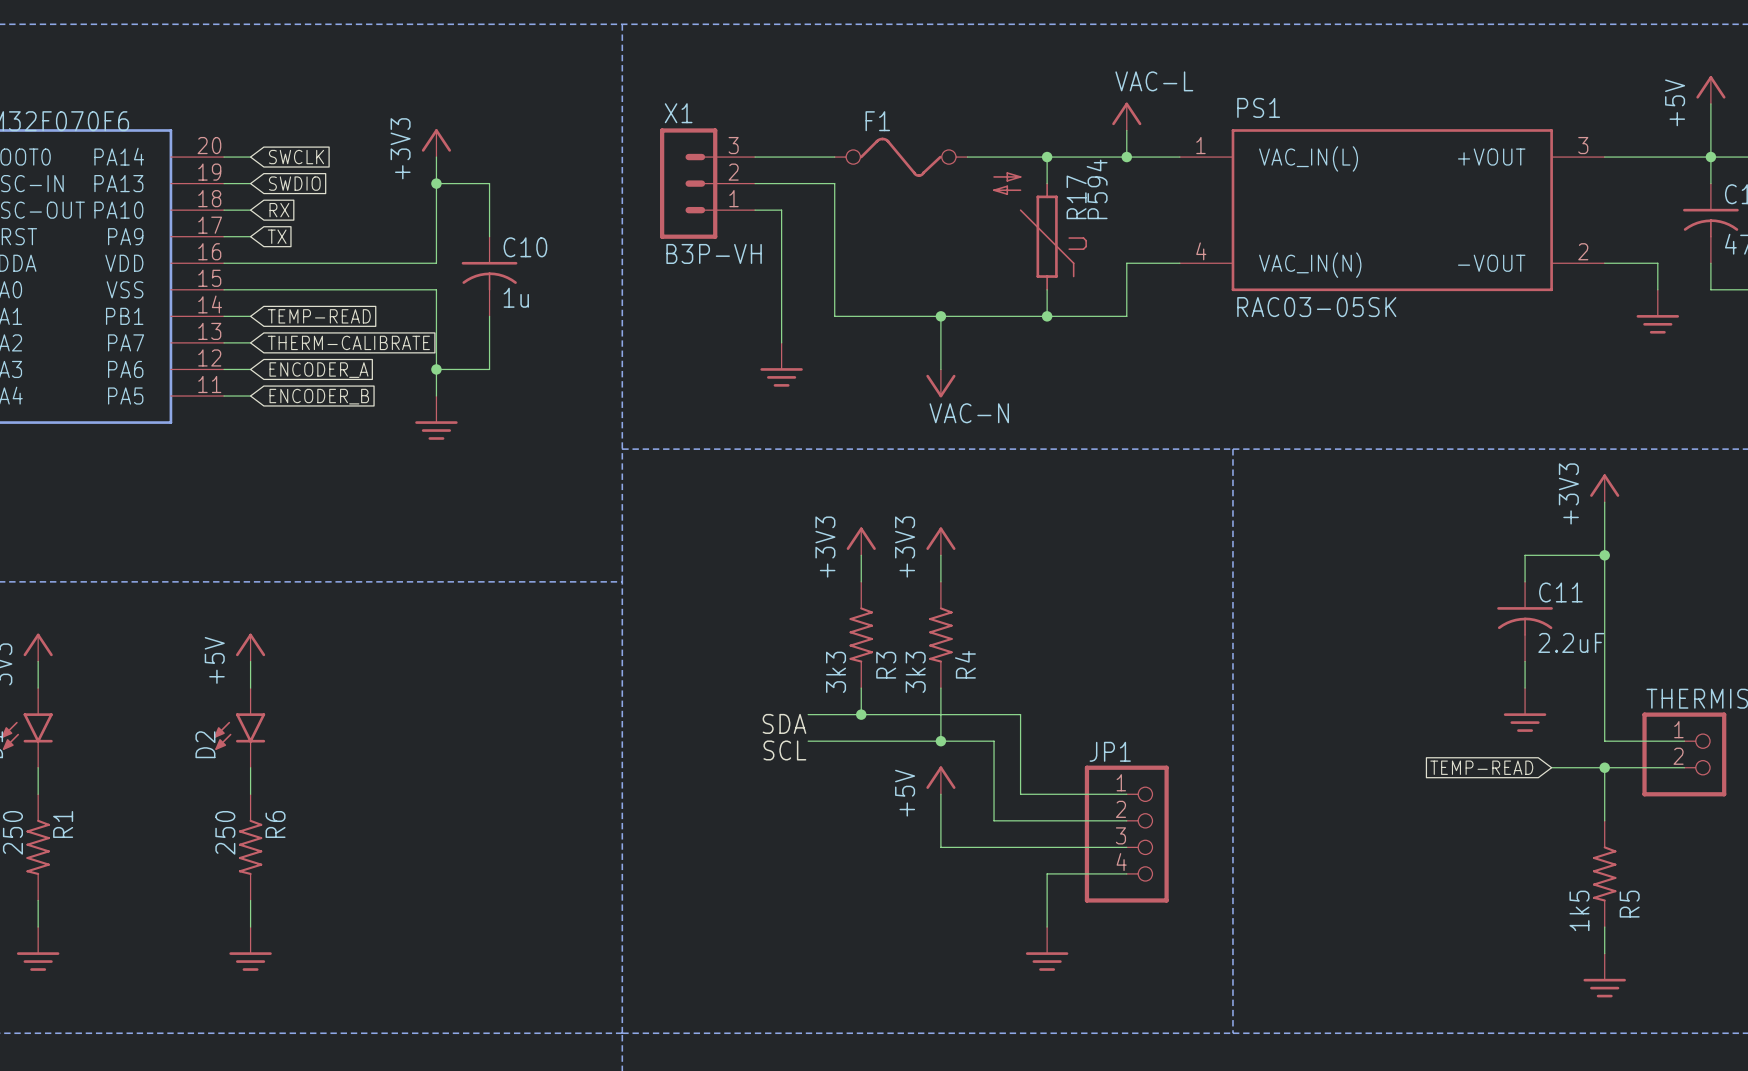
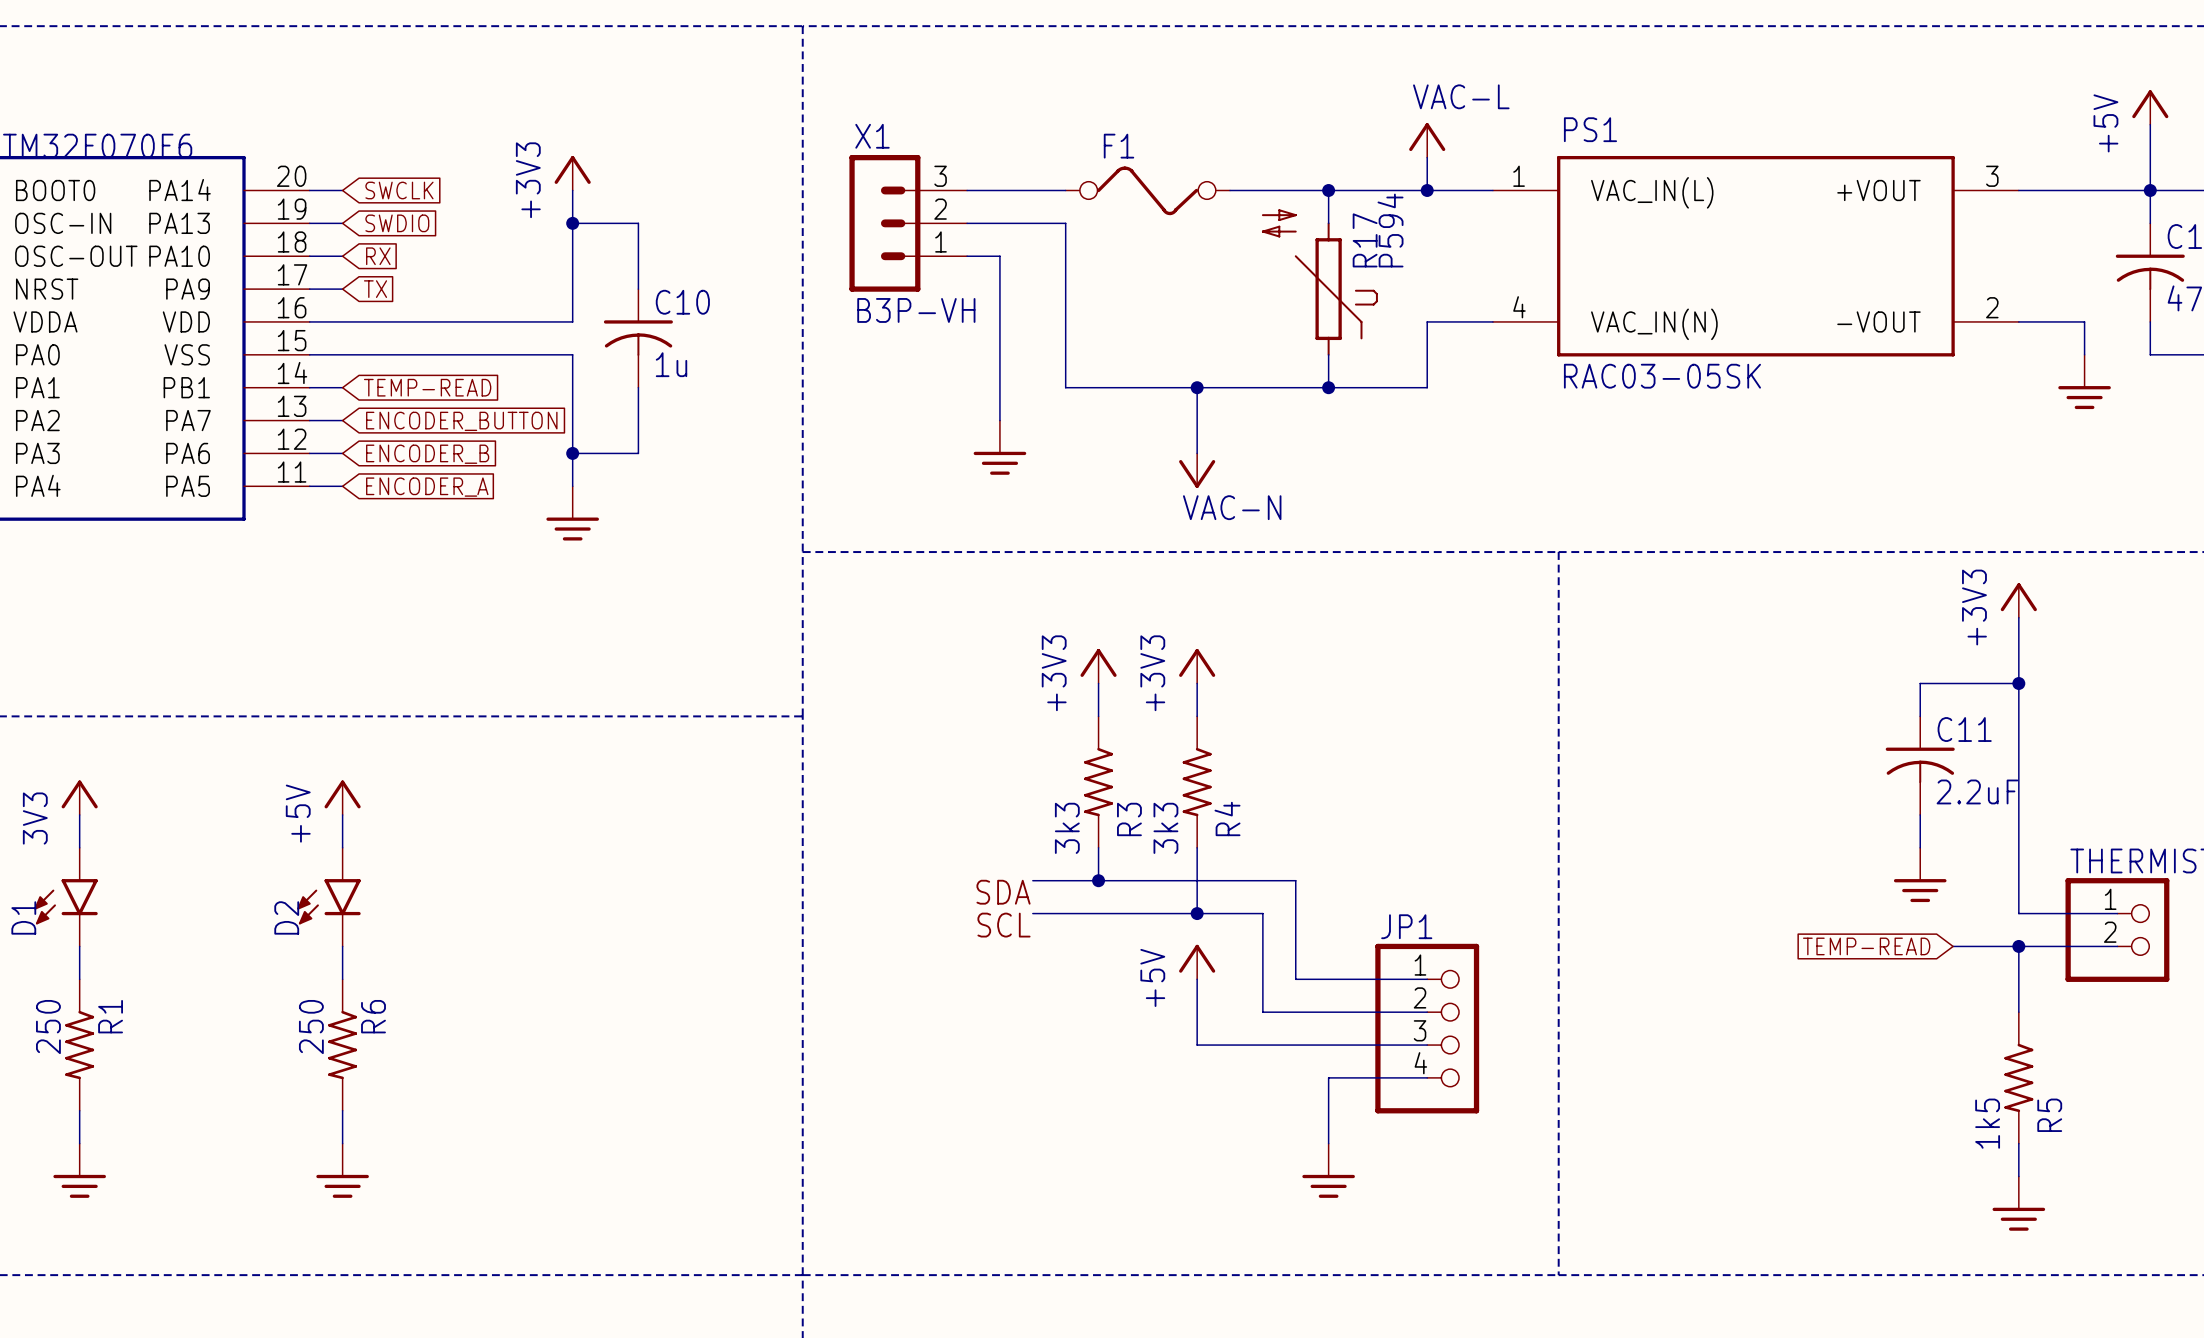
global label: THERM-CALIBRATE (348, 342) -> ENCODER_BUTTON (461, 421)
global label: ENCODER_A (318, 370) -> ENCODER_B (427, 454)
global label: ENCODER_B (319, 396) -> ENCODER_A (427, 487)

